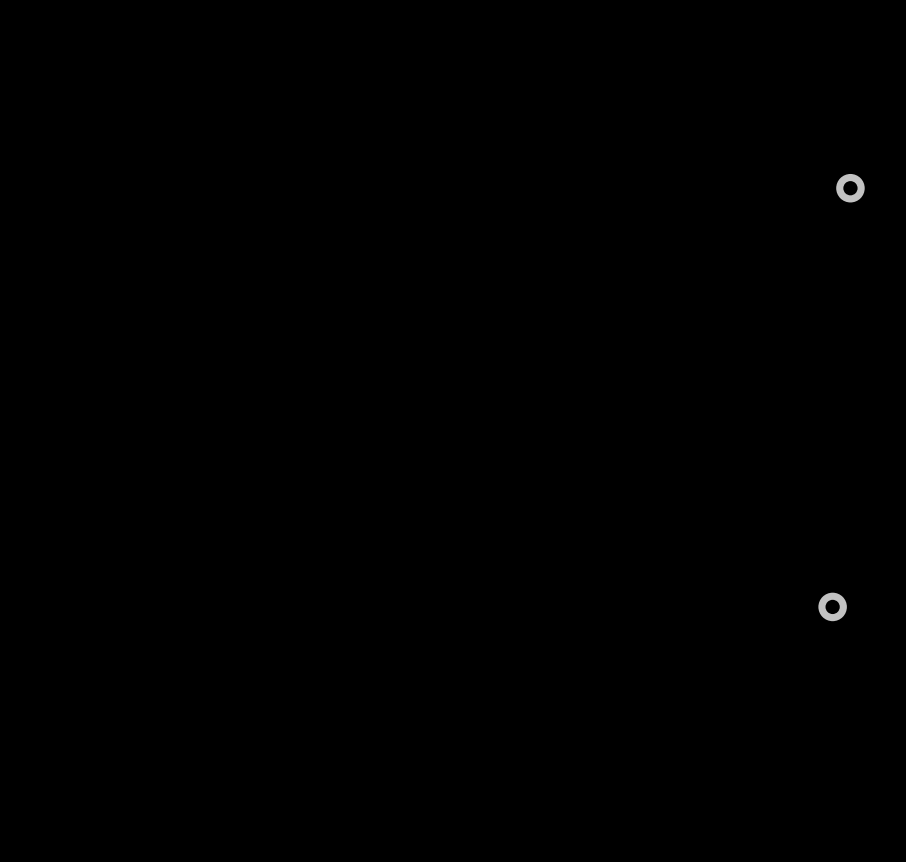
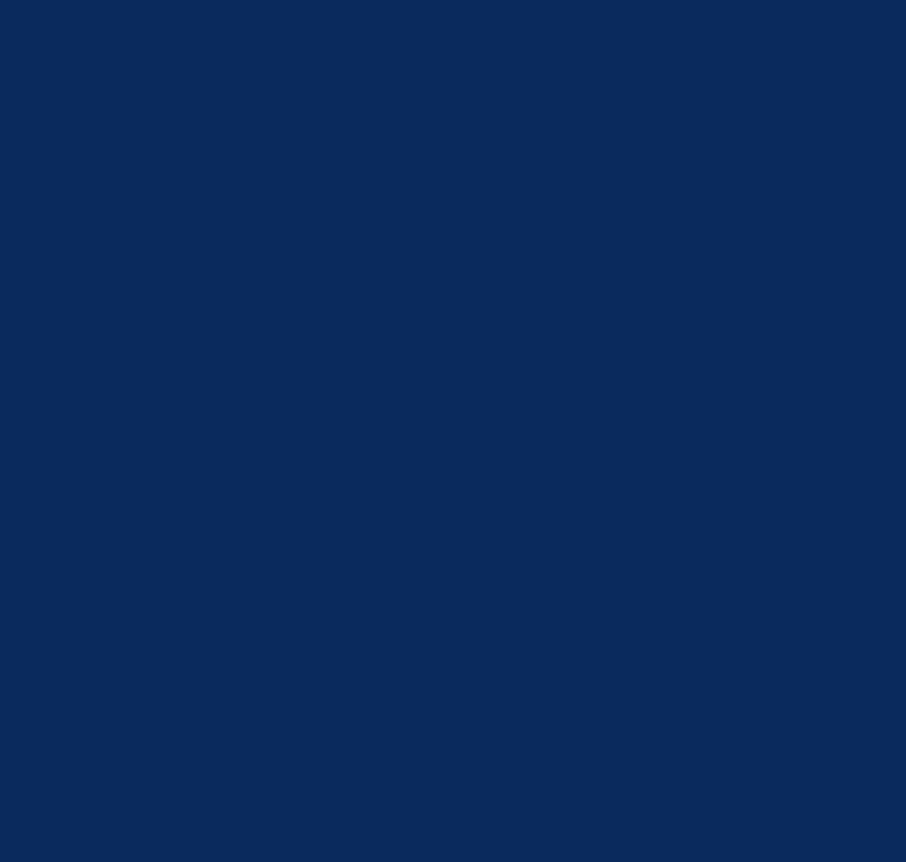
via: (850, 188) -> none
via: (832, 606) -> none

